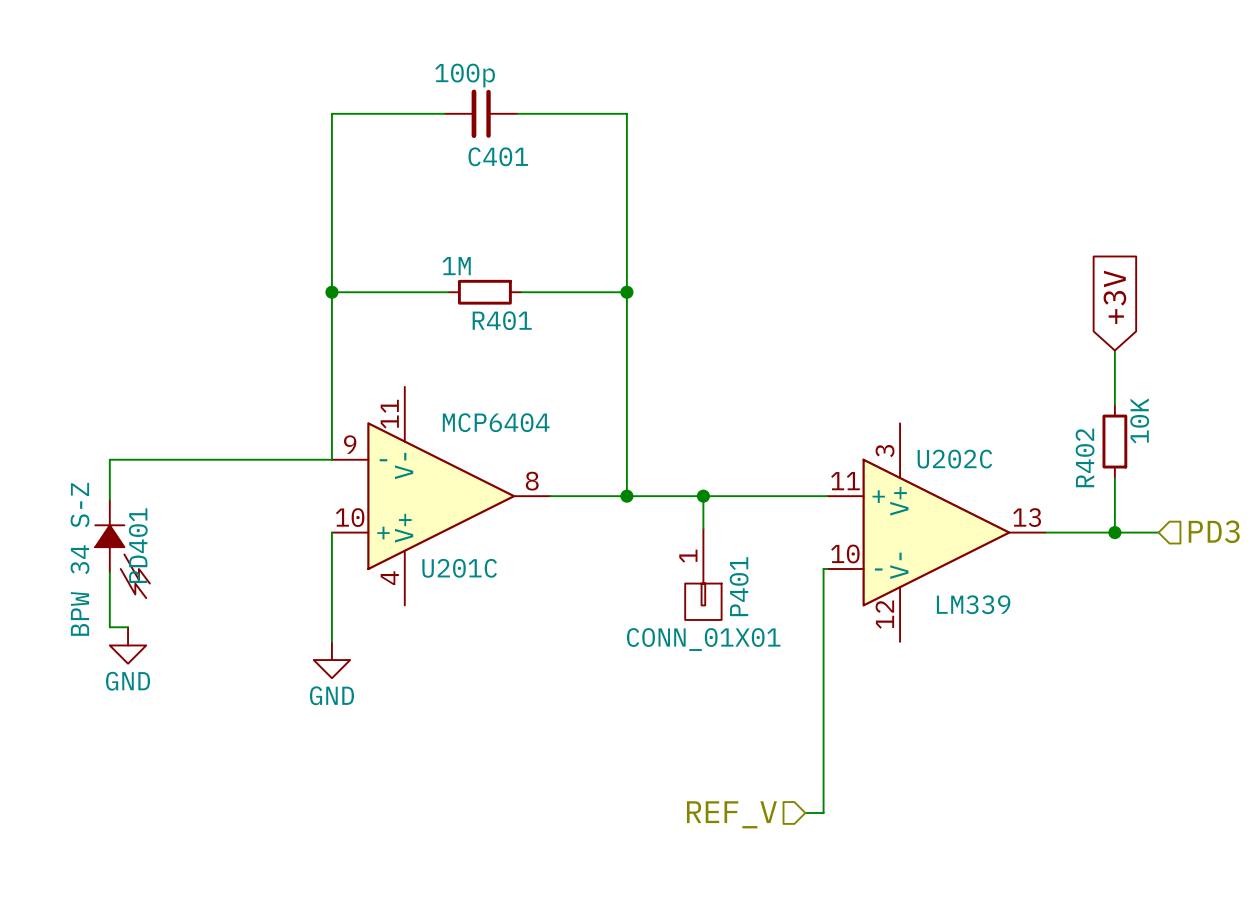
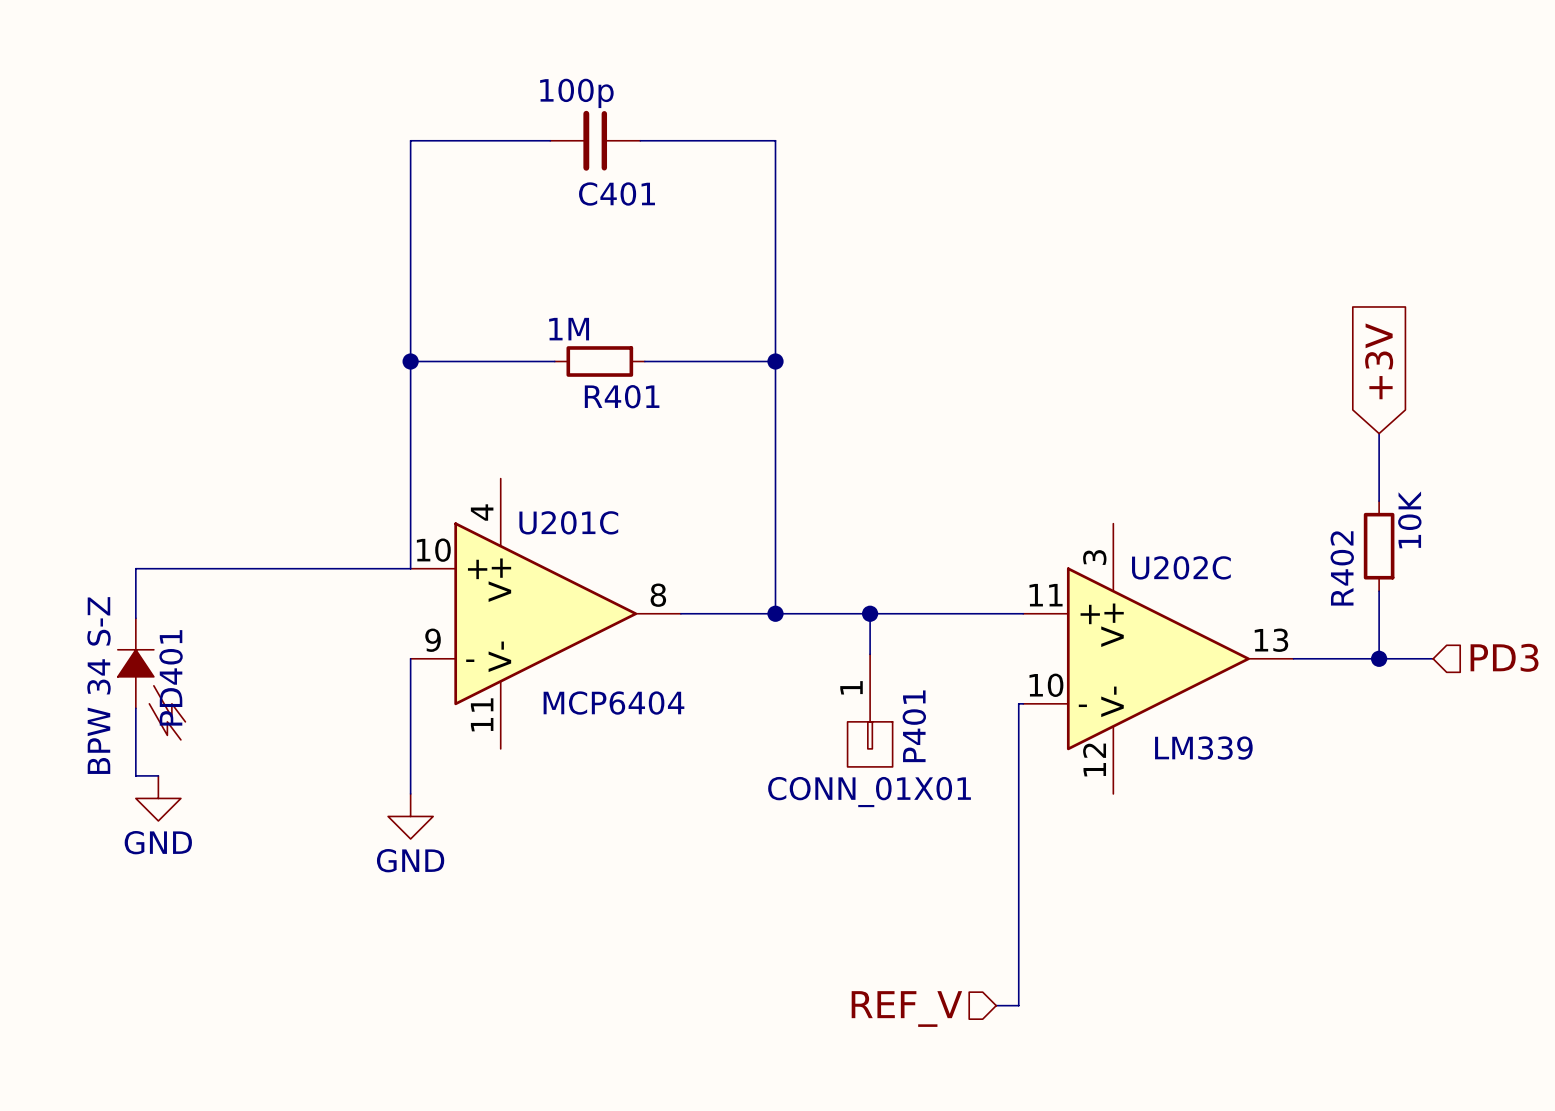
U201C flip: as is (441, 496) -> up-down (545, 613)

